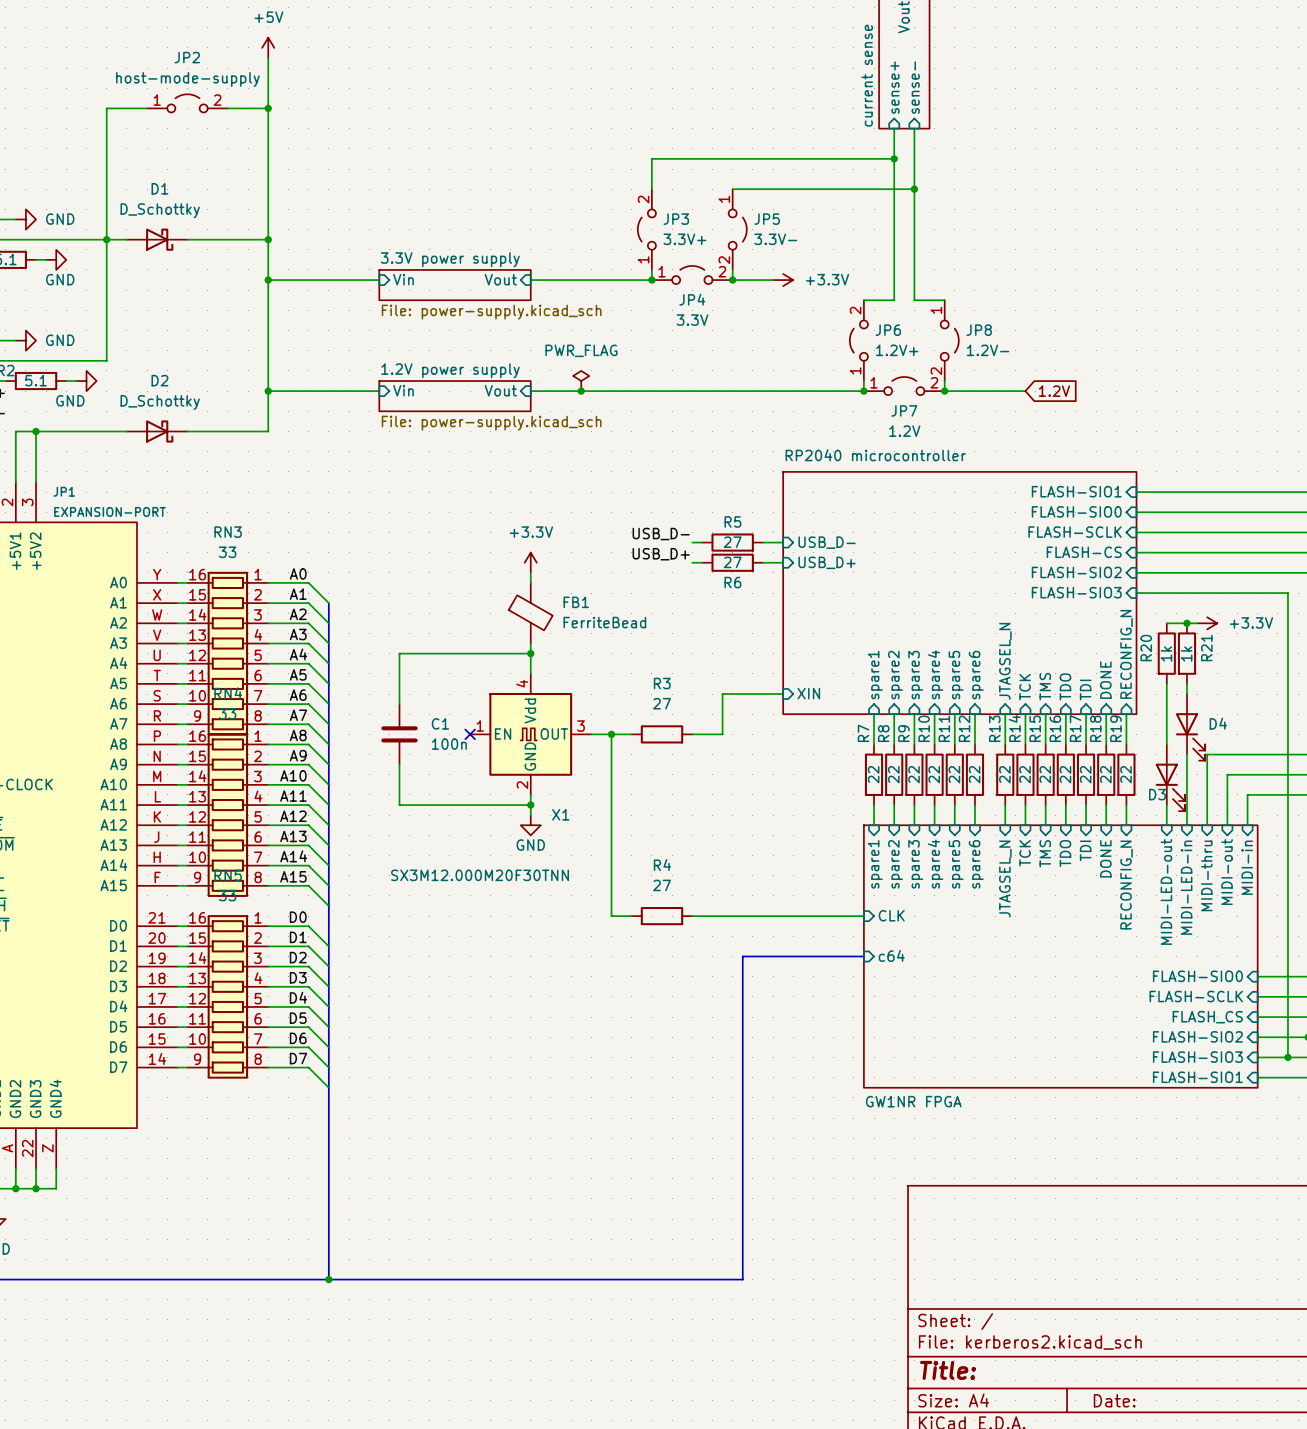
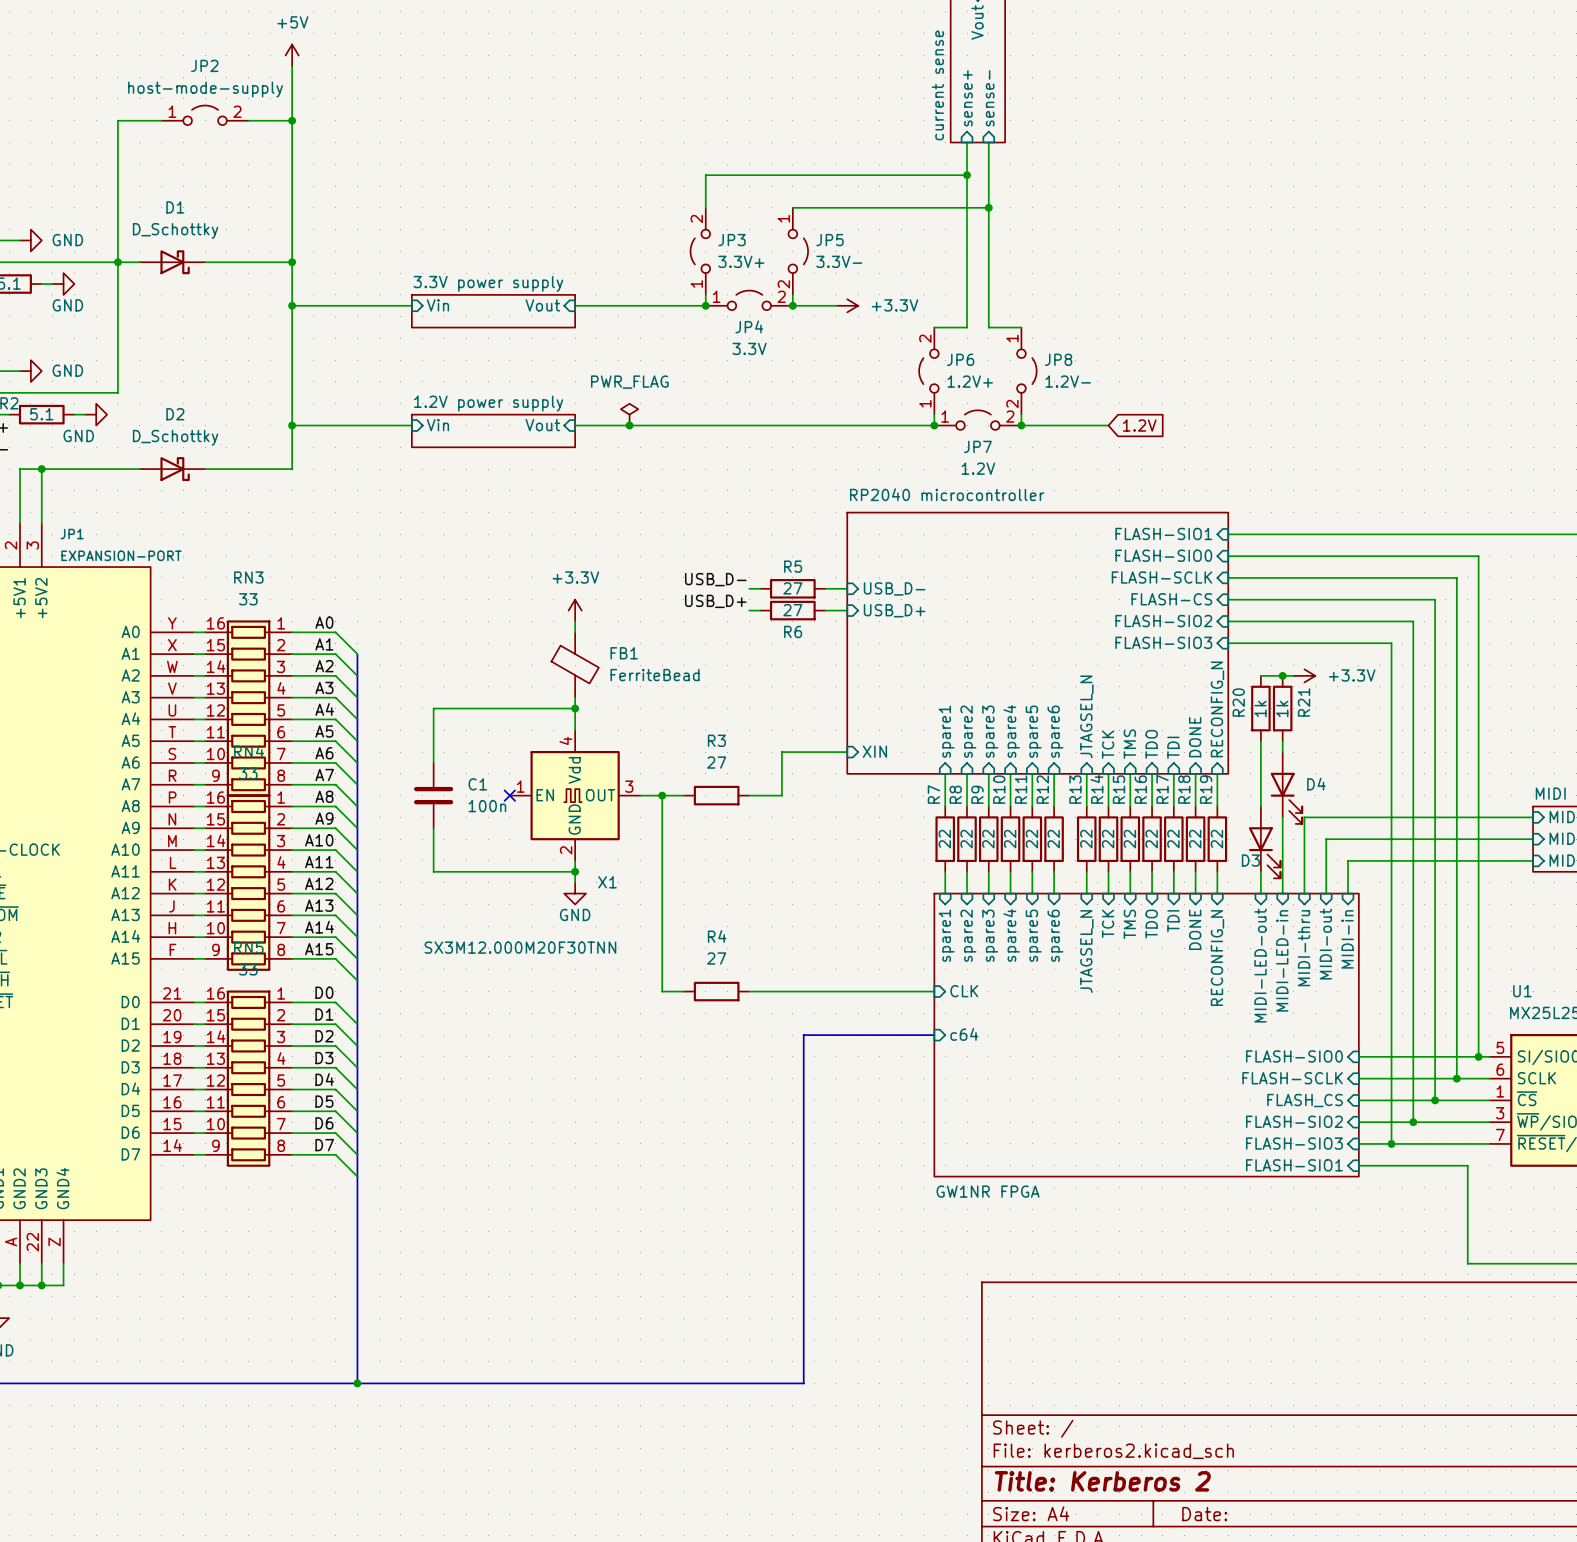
sheet 3.3V power supply value: File: power-supply.kicad_sch (491, 312) -> none
sheet 1.2V power supply value: File: power-supply.kicad_sch (491, 423) -> none
title block: Title: (948, 1370) -> Title: Kerberos 2 (1102, 1481)

